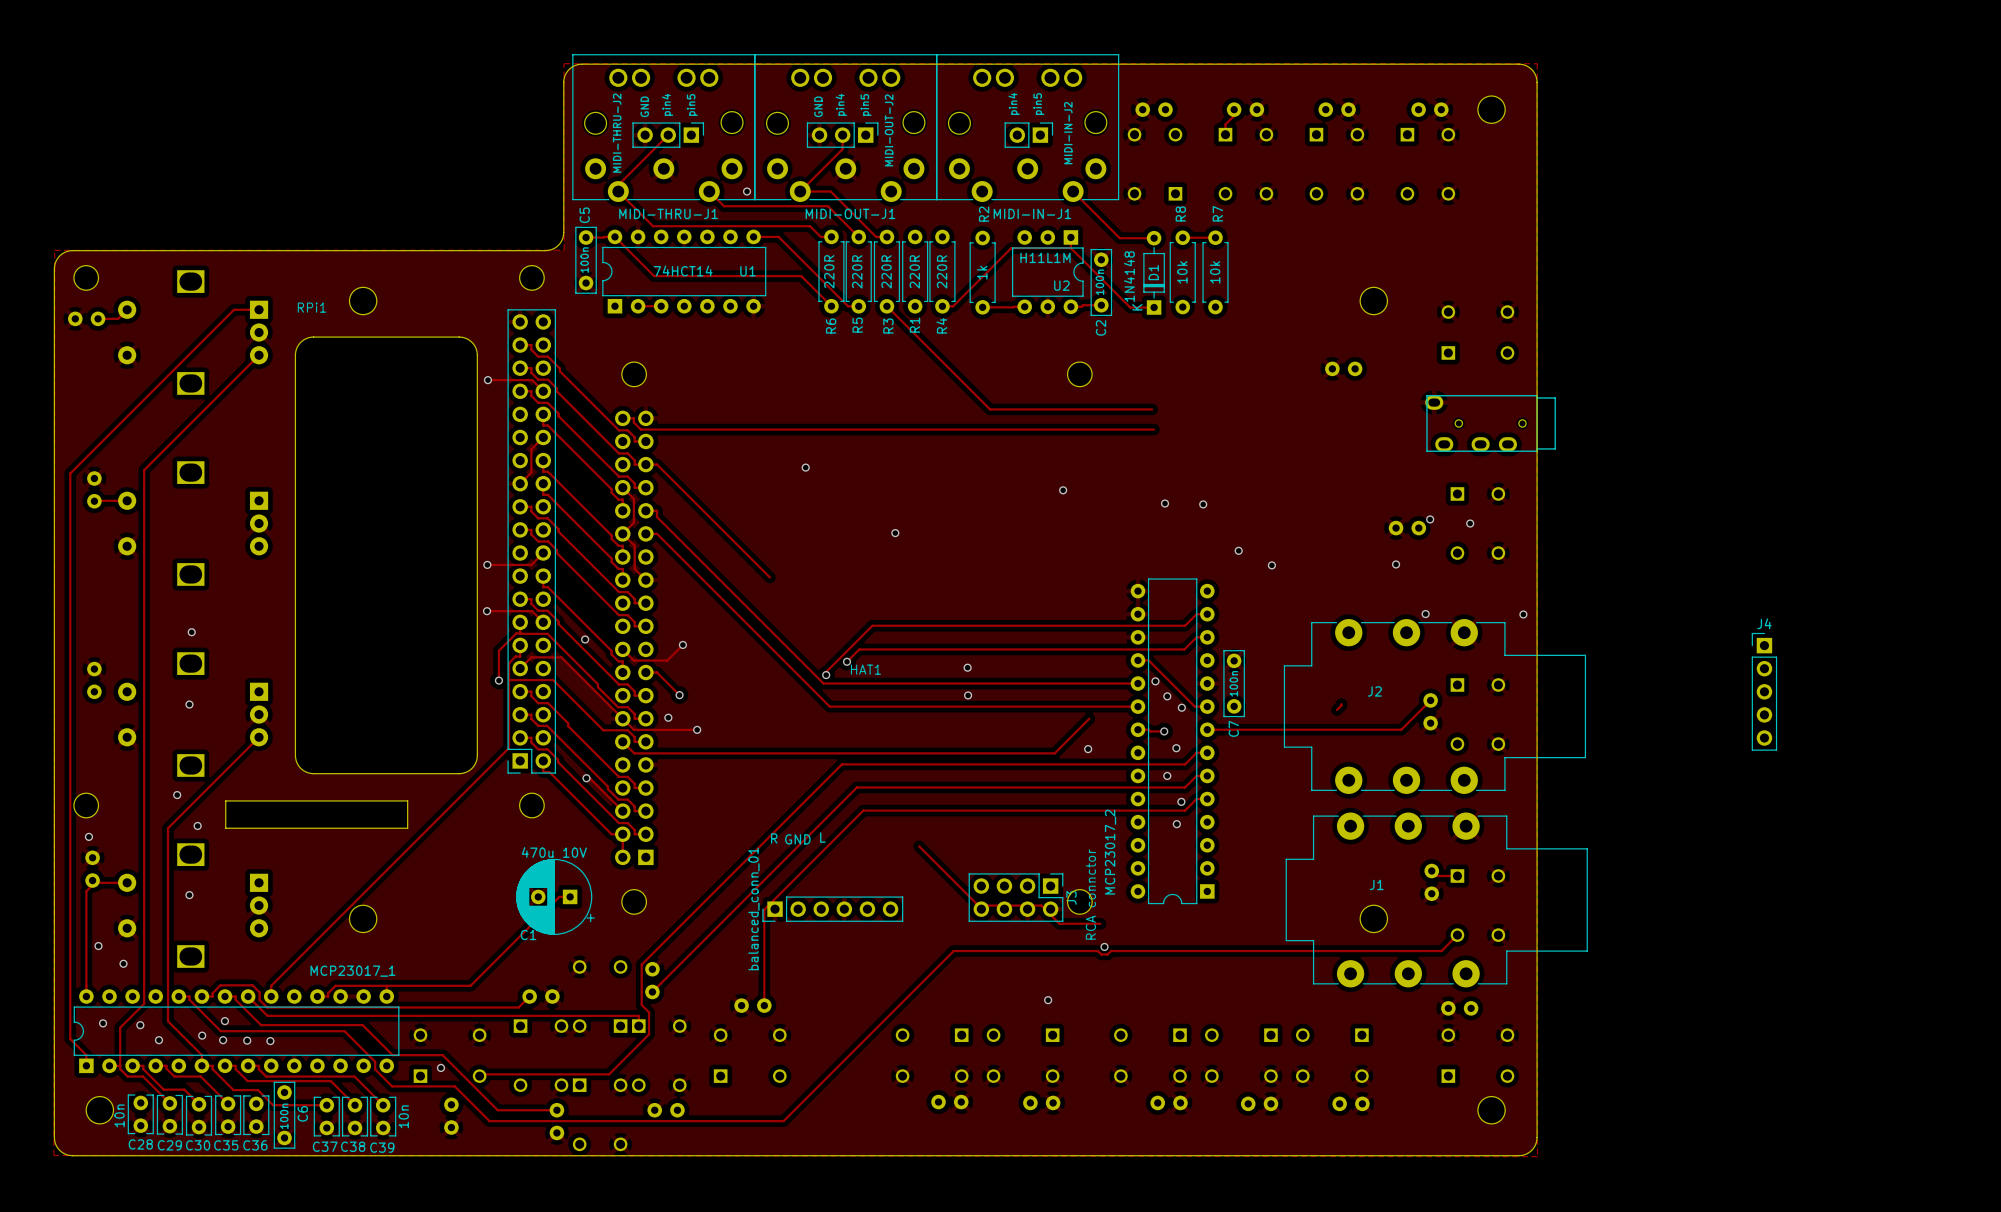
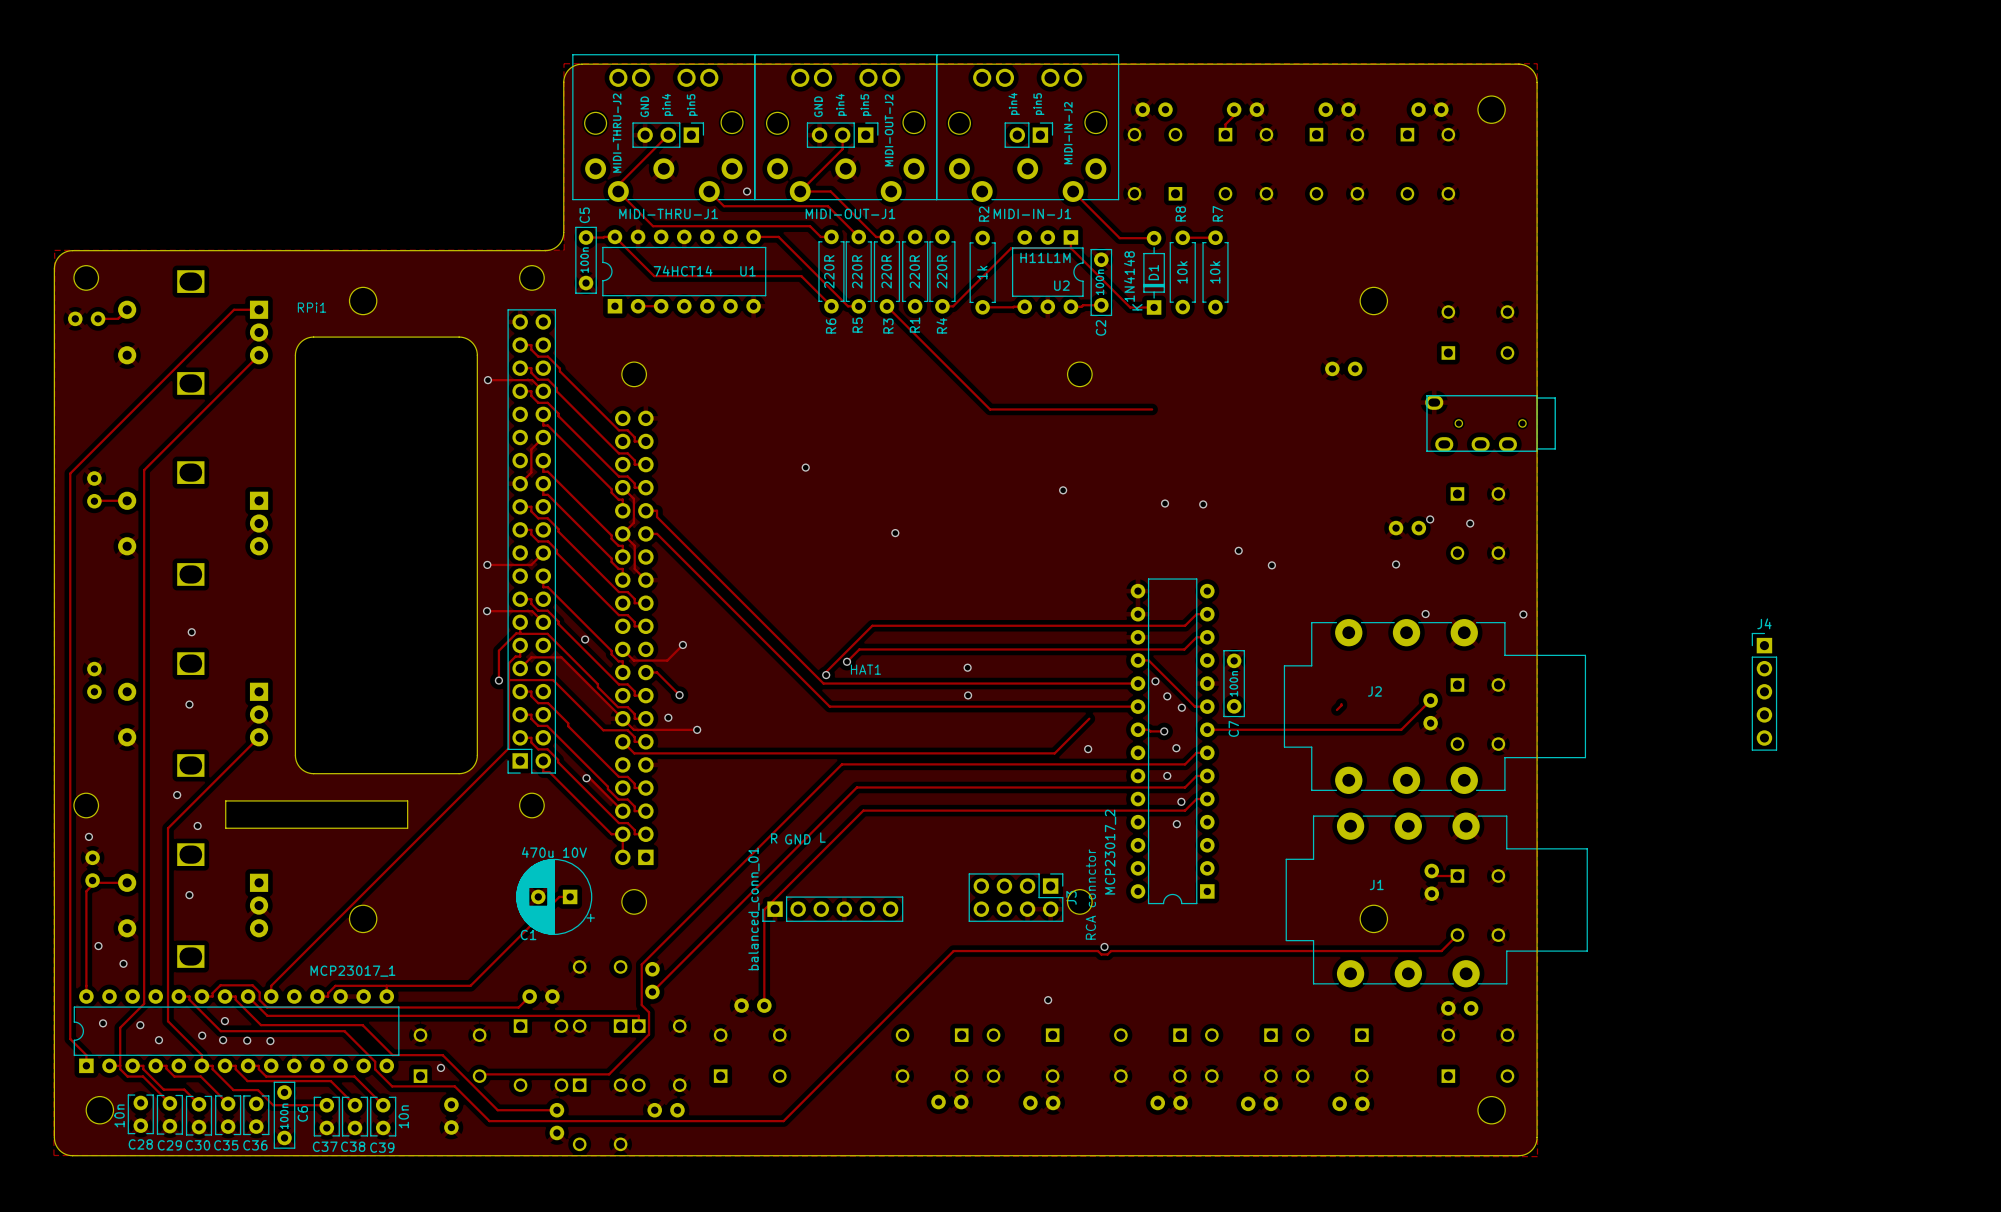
track: (622, 418) (633, 418) (633, 422) (640, 429) (1153, 429) -> none
track: (645, 464) (657, 464) (769, 577) -> none
track: (919, 846) (978, 905) -> none
track: (986, 905) (1041, 905) (1059, 923) (1100, 923) -> none

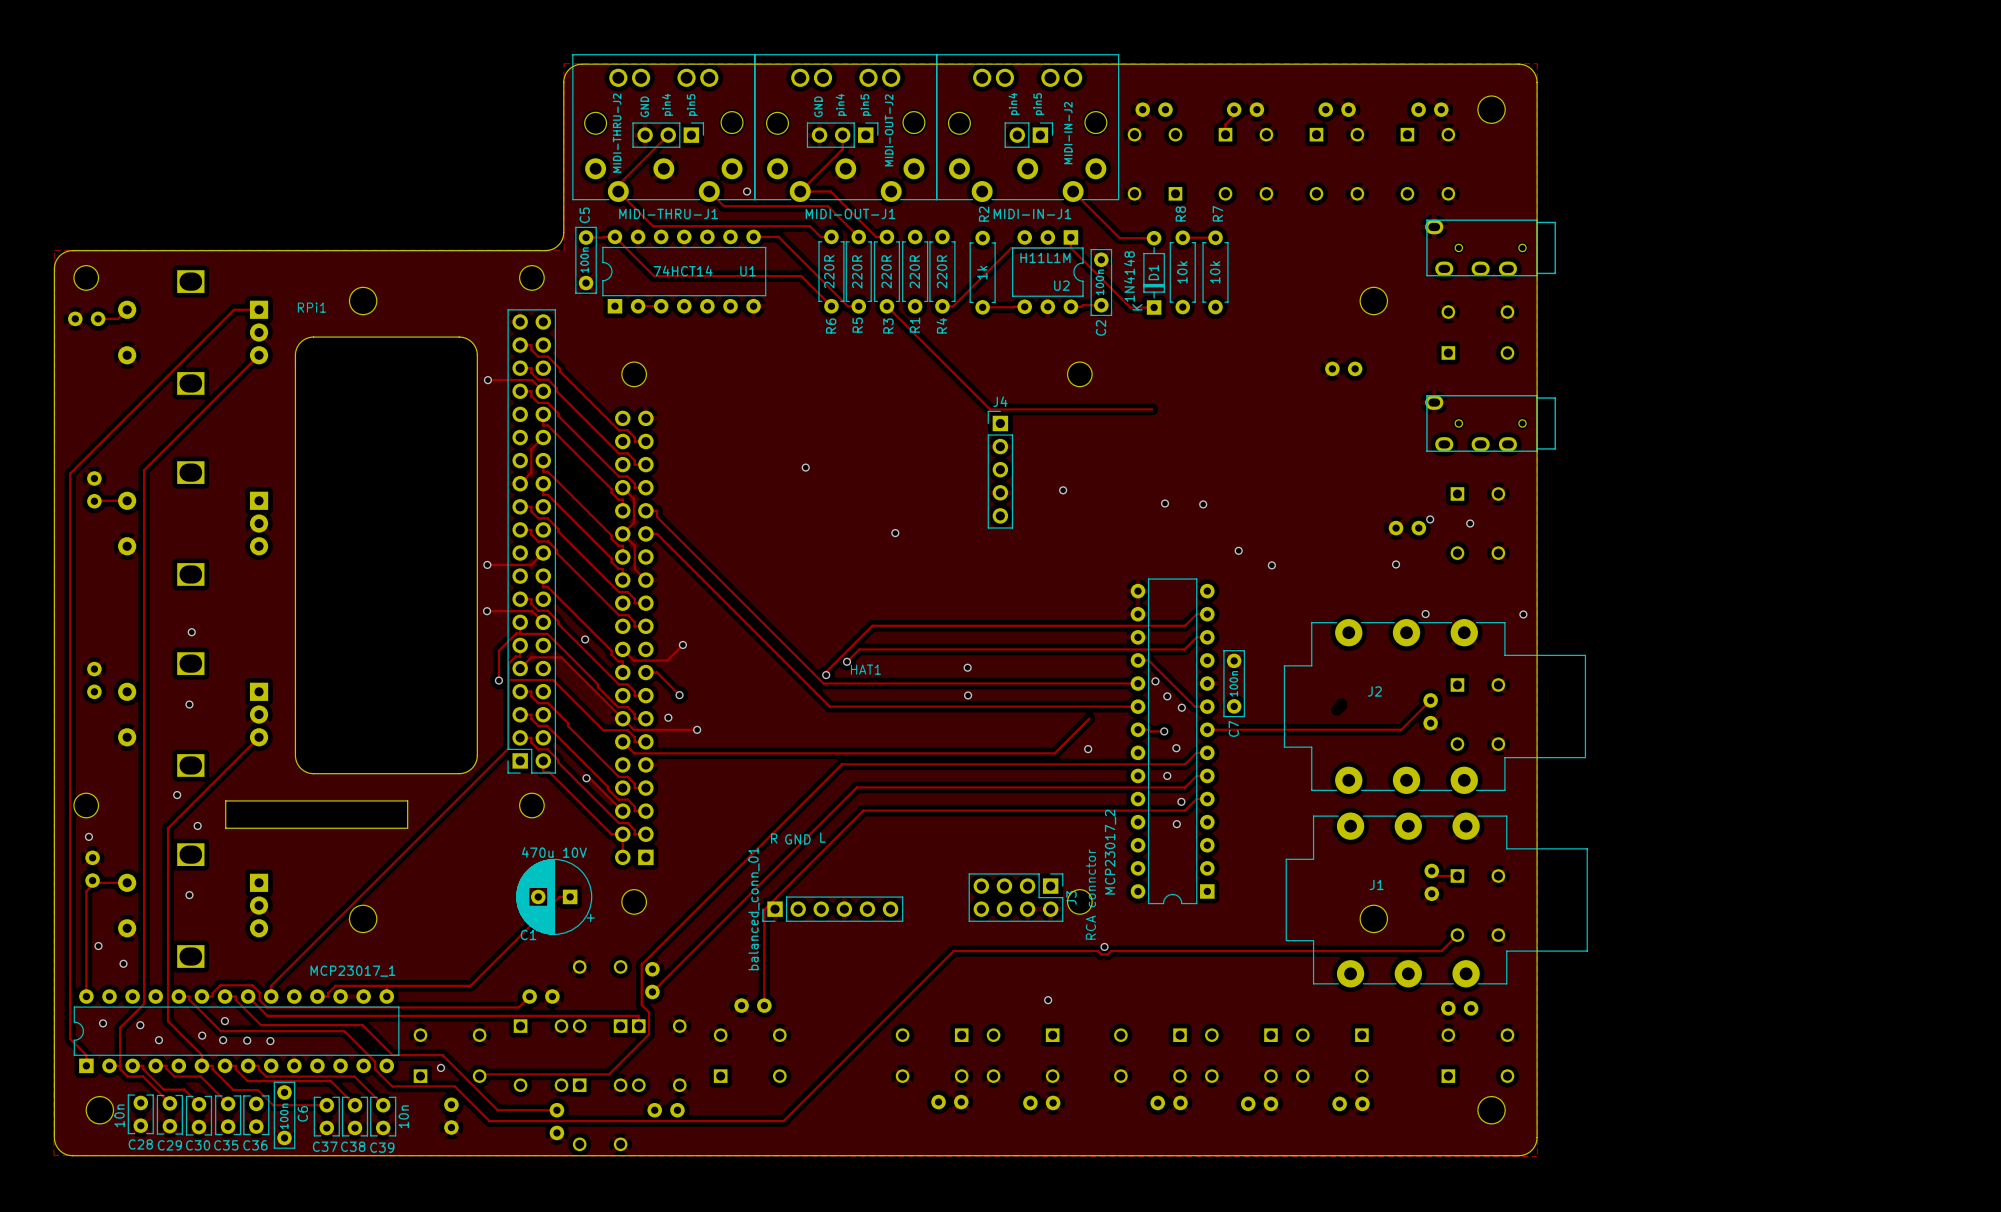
part: none -> (1490, 247)
J4 position: (1764, 691) -> (1000, 469)
track: (1341, 704) (1336, 710) -> none

